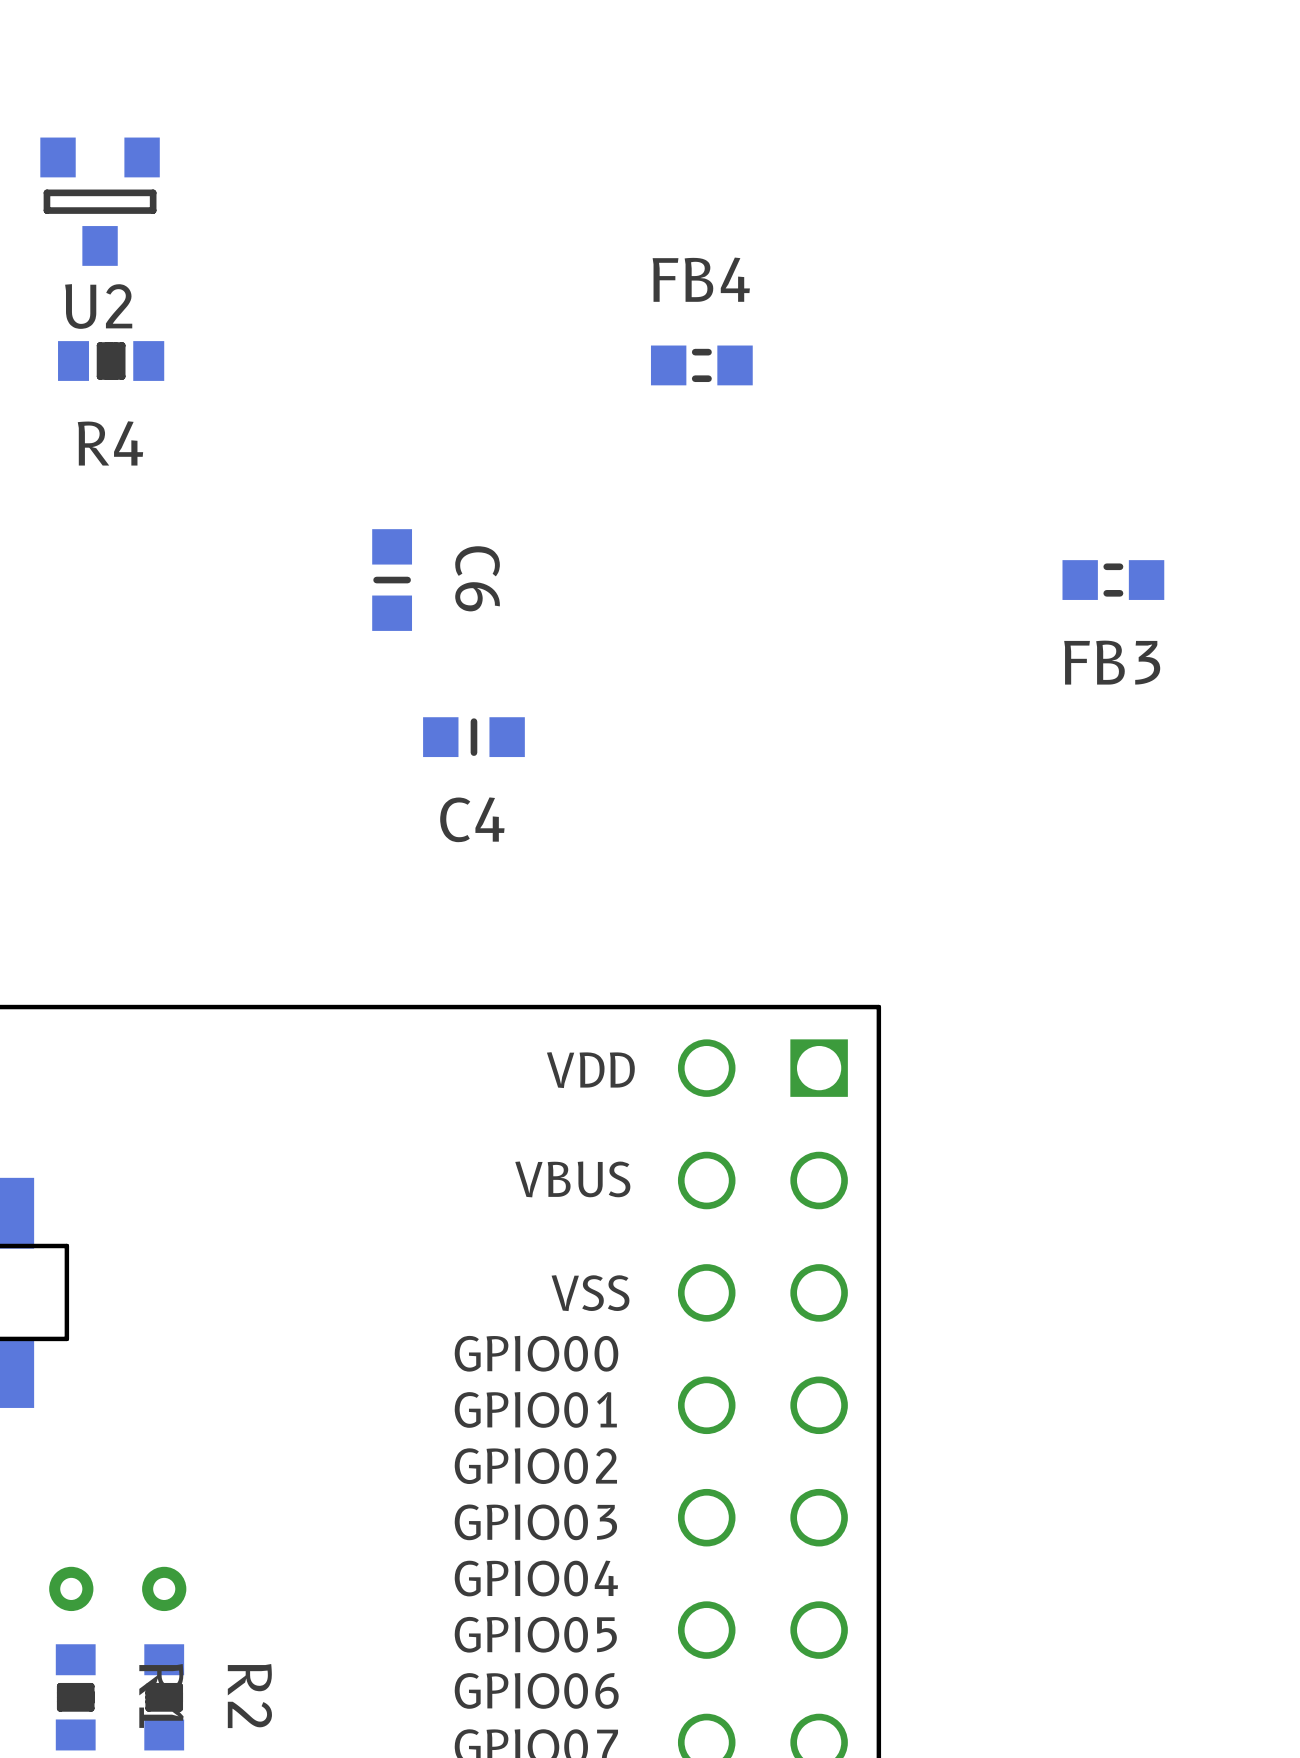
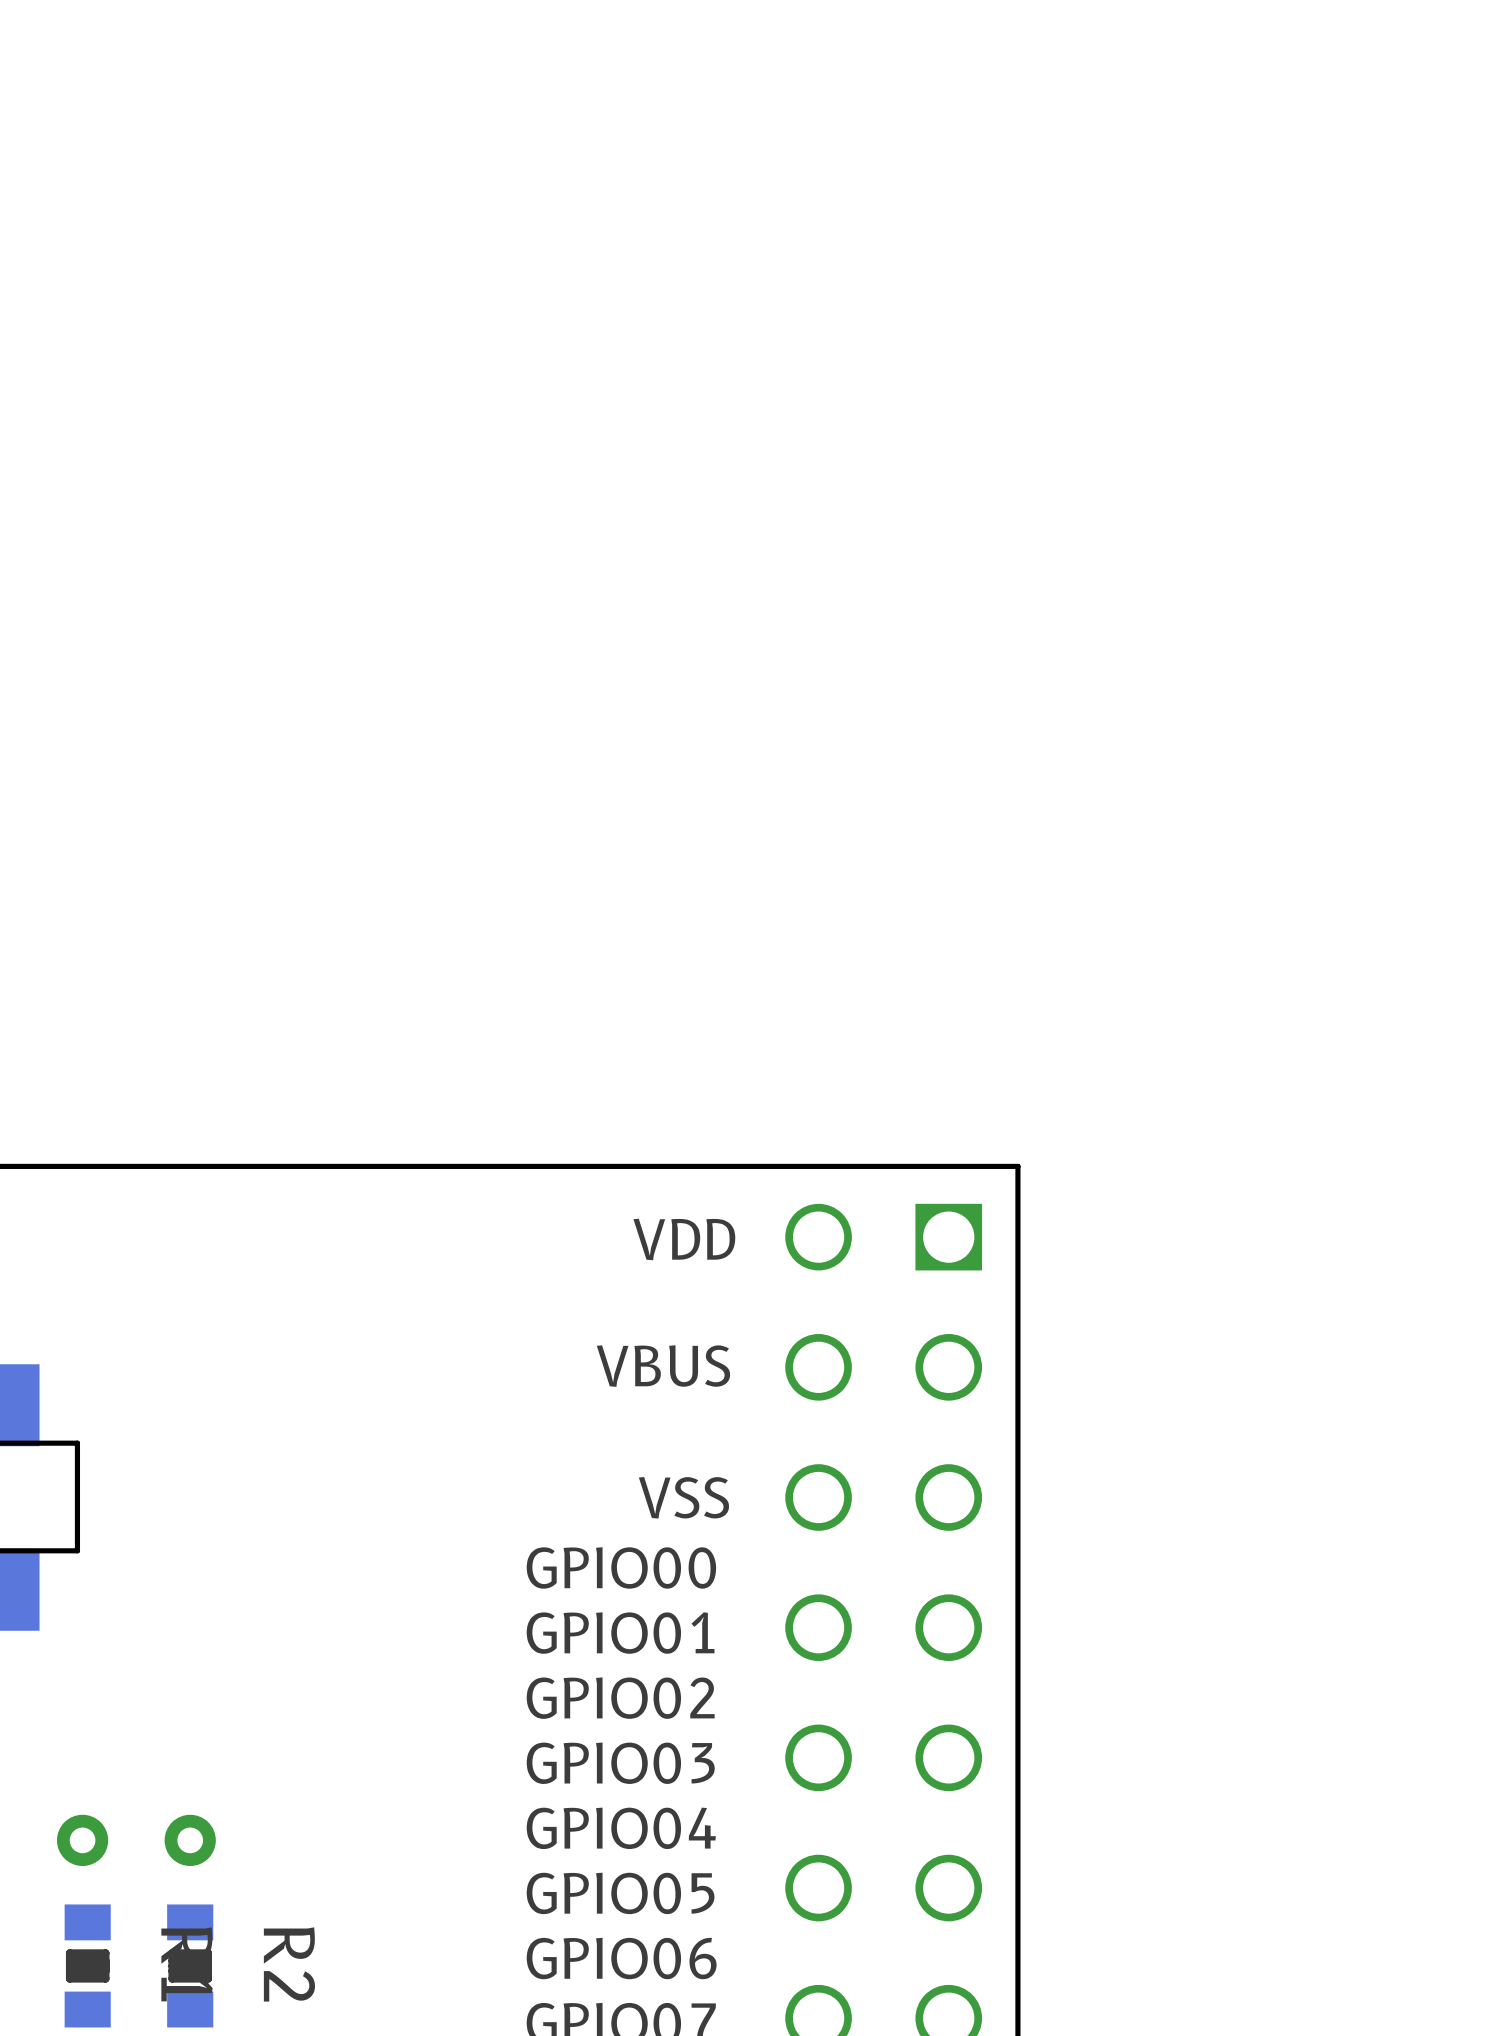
U2: (100, 201) -> none
R4: (111, 361) -> none
FB4: (701, 365) -> none
C6: (392, 580) -> none
FB3: (1113, 580) -> none
C4: (473, 737) -> none

